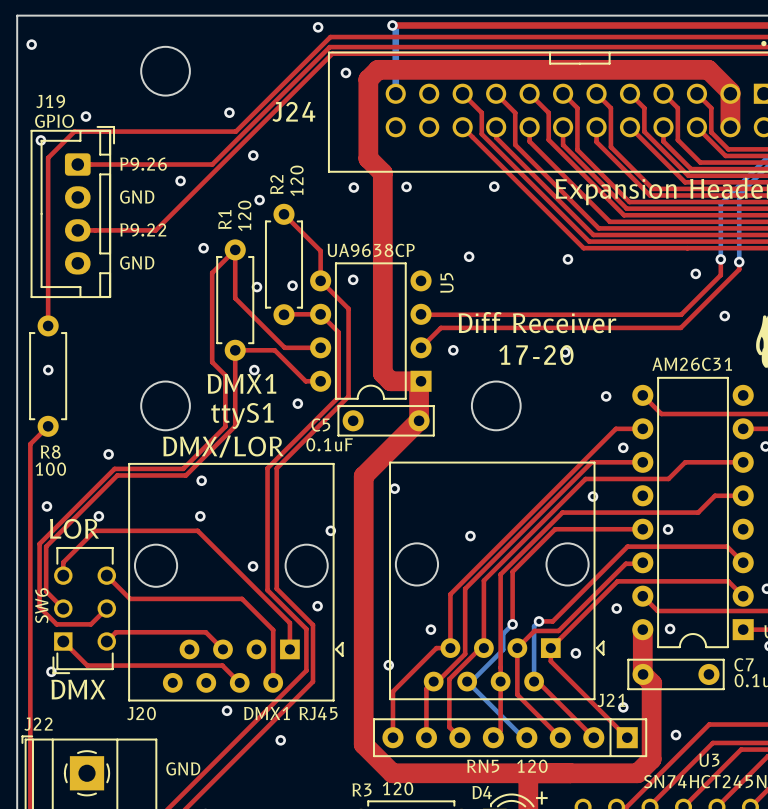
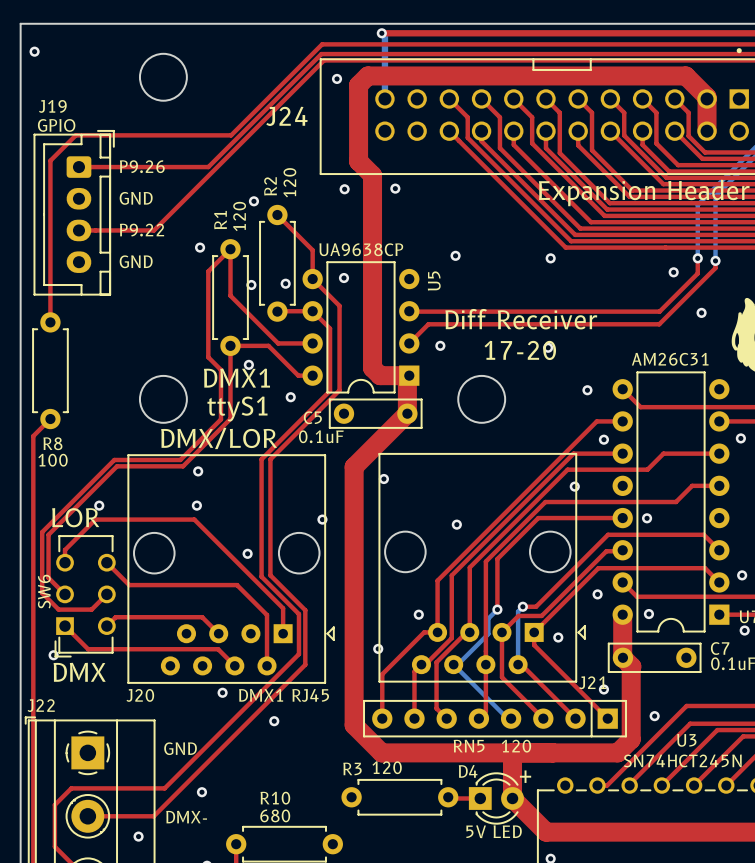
via: (318, 27) -> none
via: (229, 112) -> none
via: (85, 116) -> none
via: (40, 140) -> none
via: (253, 155) -> none
via: (180, 180) -> none
via: (494, 186) -> none
via: (48, 370) -> none
via: (108, 454) -> none
via: (46, 506) -> none
via: (317, 606) -> none

